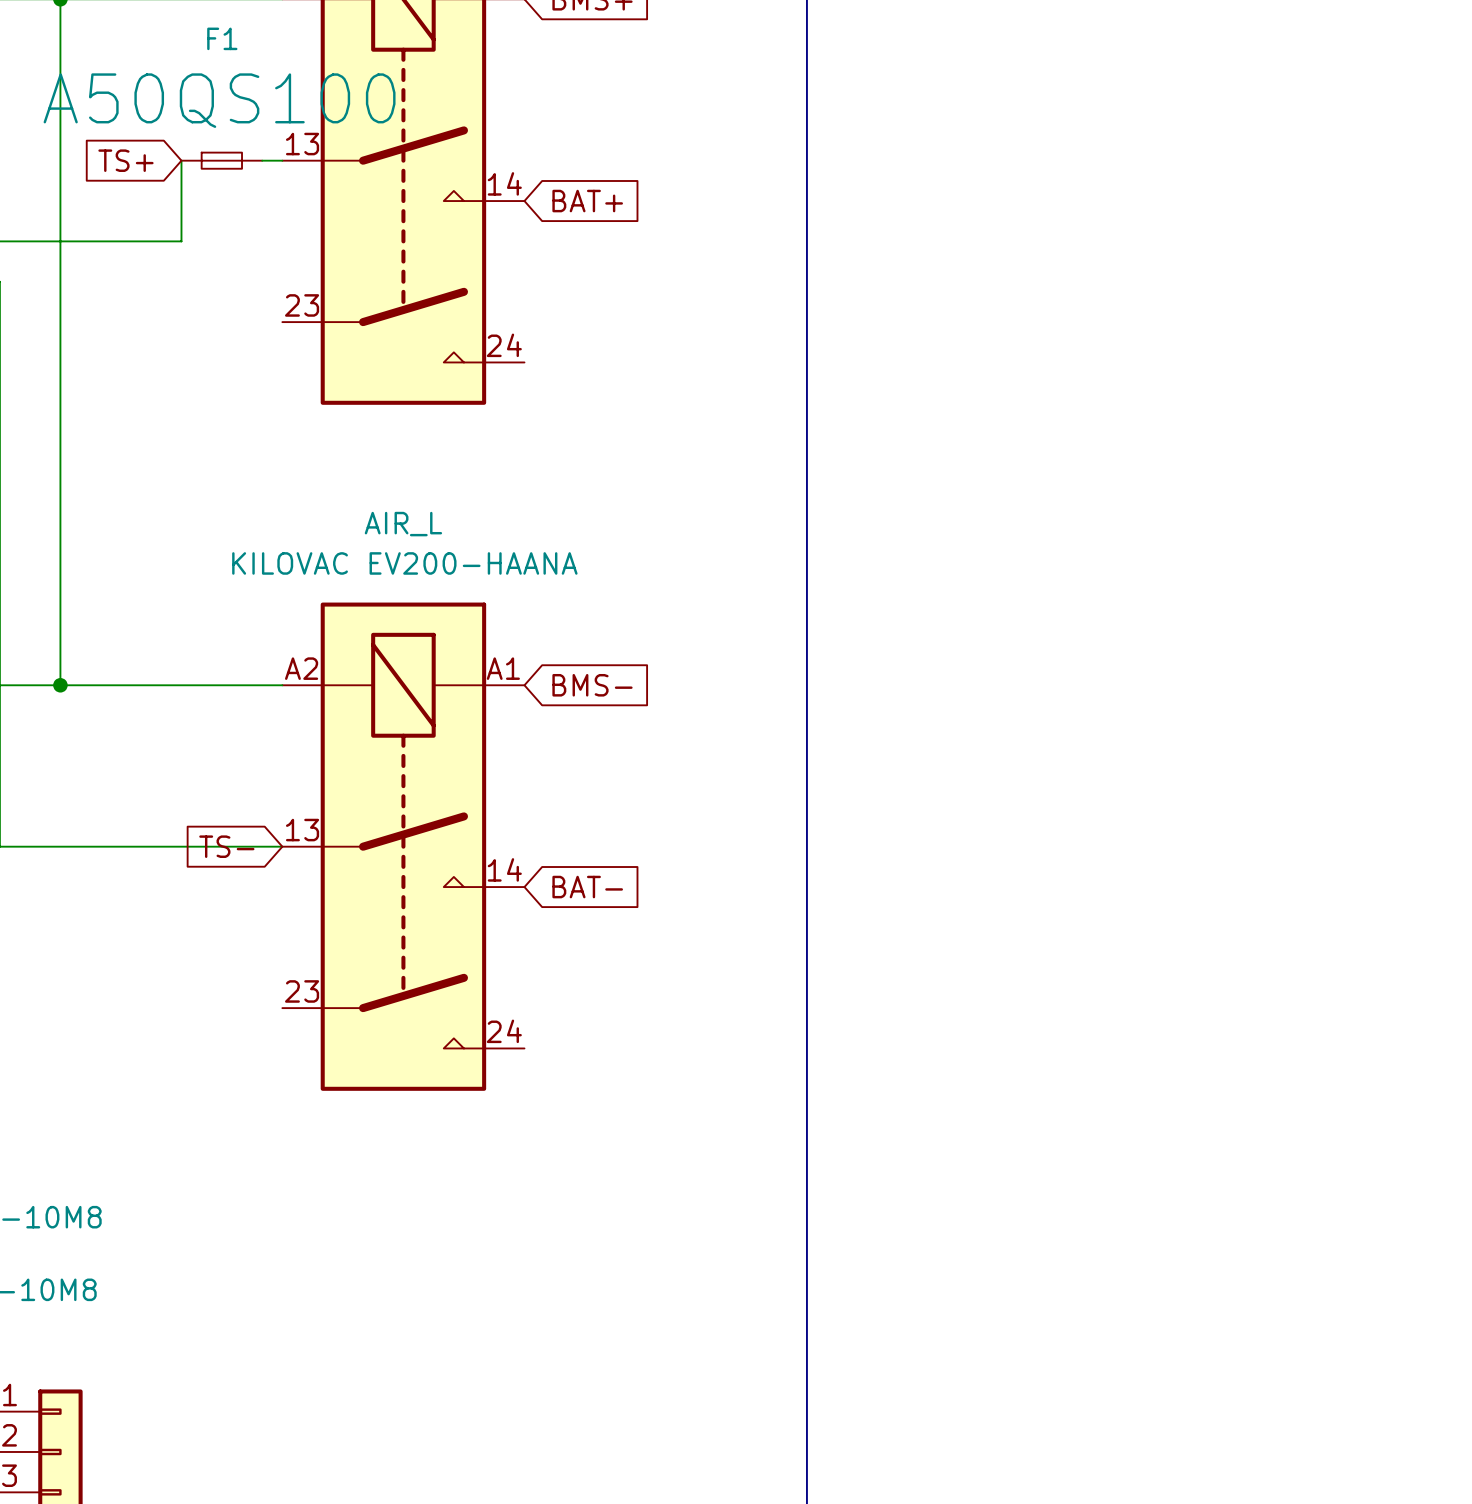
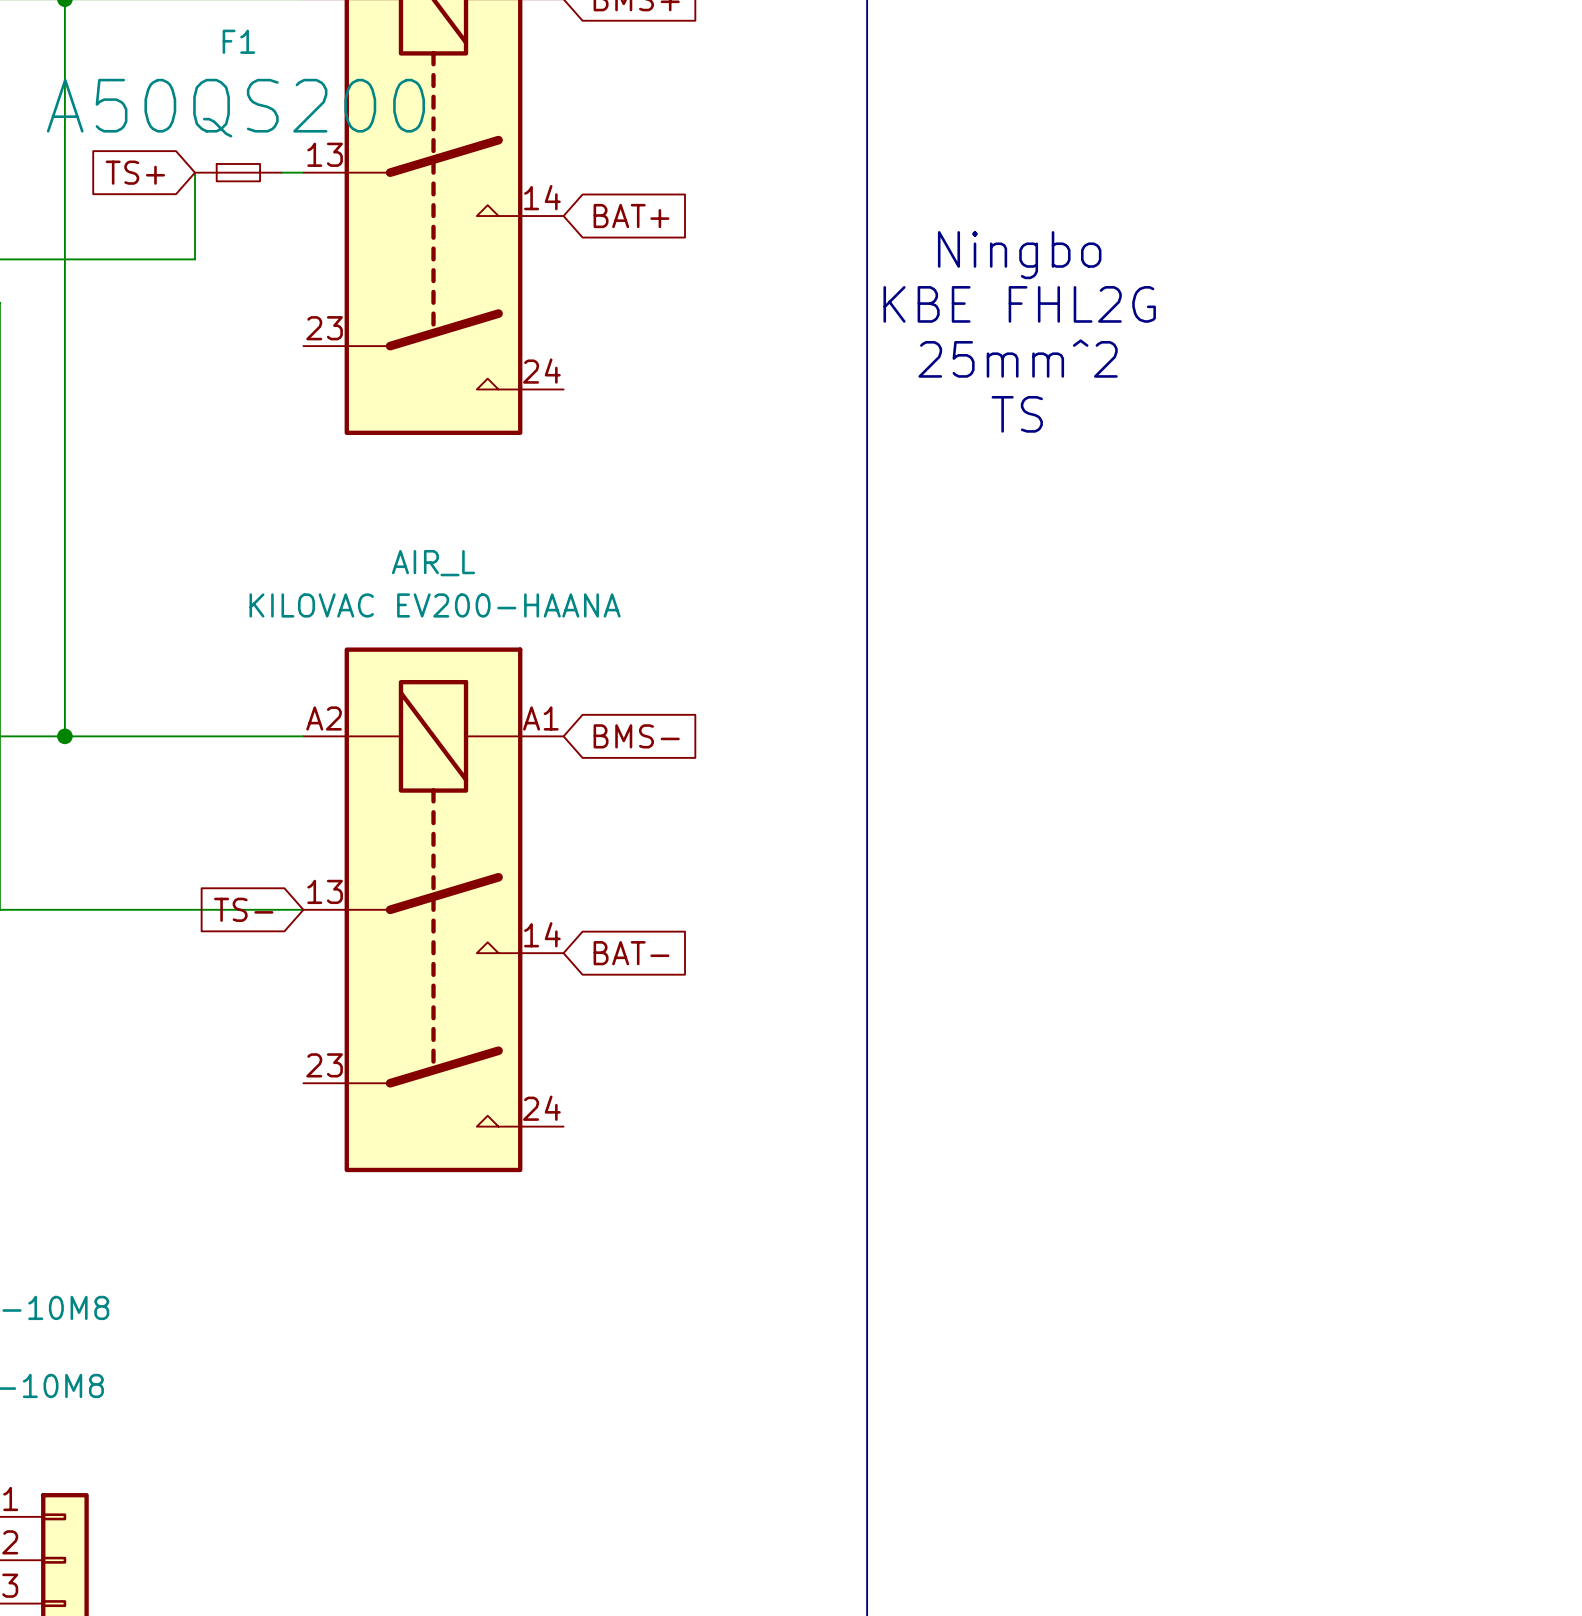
F1 value: A50QS100 (219, 100) -> A50QS200 (235, 108)
text: none -> Ningbo (1019, 255)
text: none -> KBE FHL2G (1019, 304)
text: none -> 25mm^2 (1018, 358)
text: none -> TS (1017, 414)

